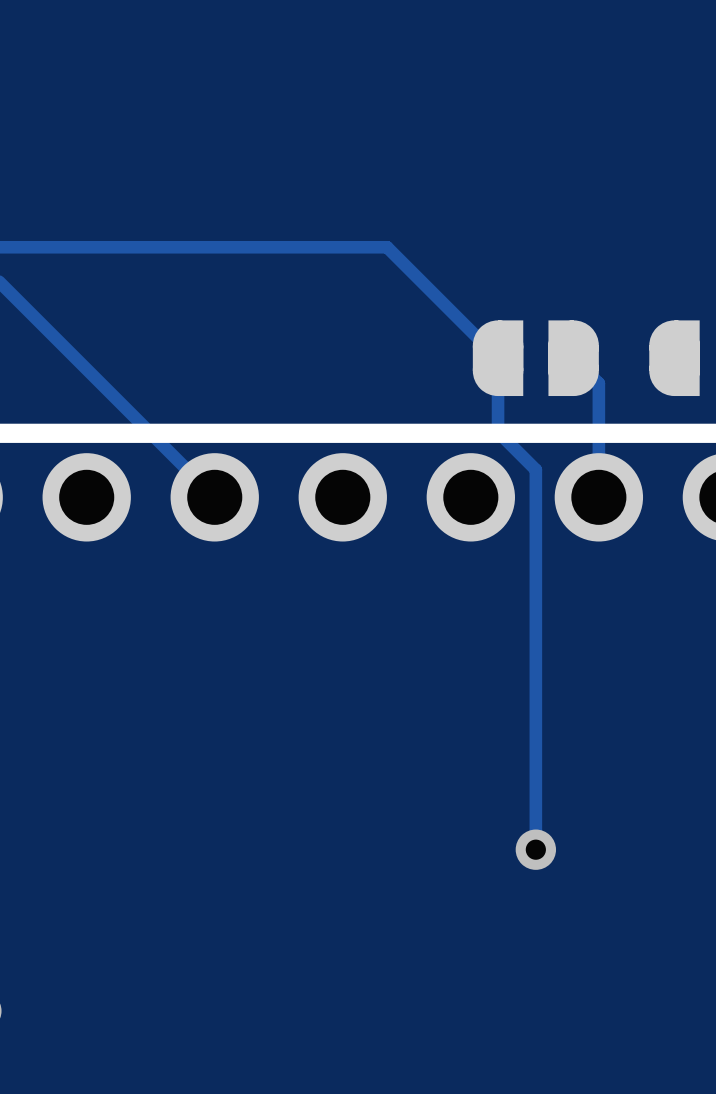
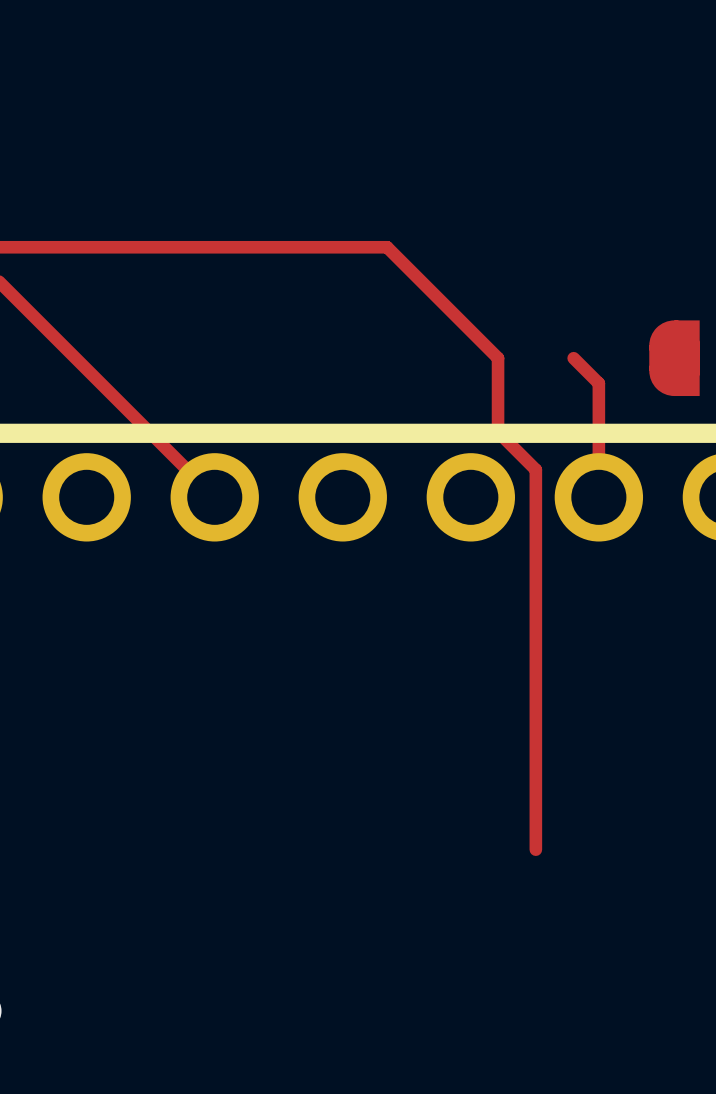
part: (535, 358) -> none
via: (535, 849) -> none

